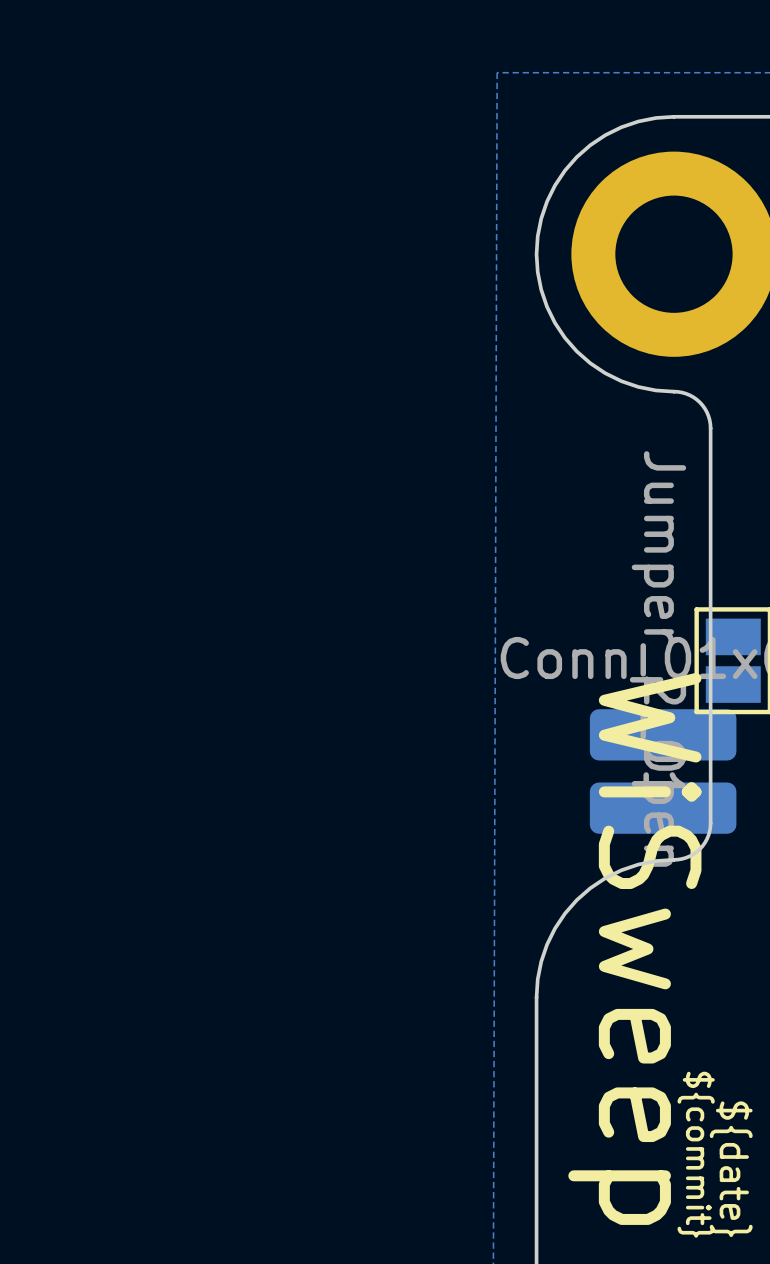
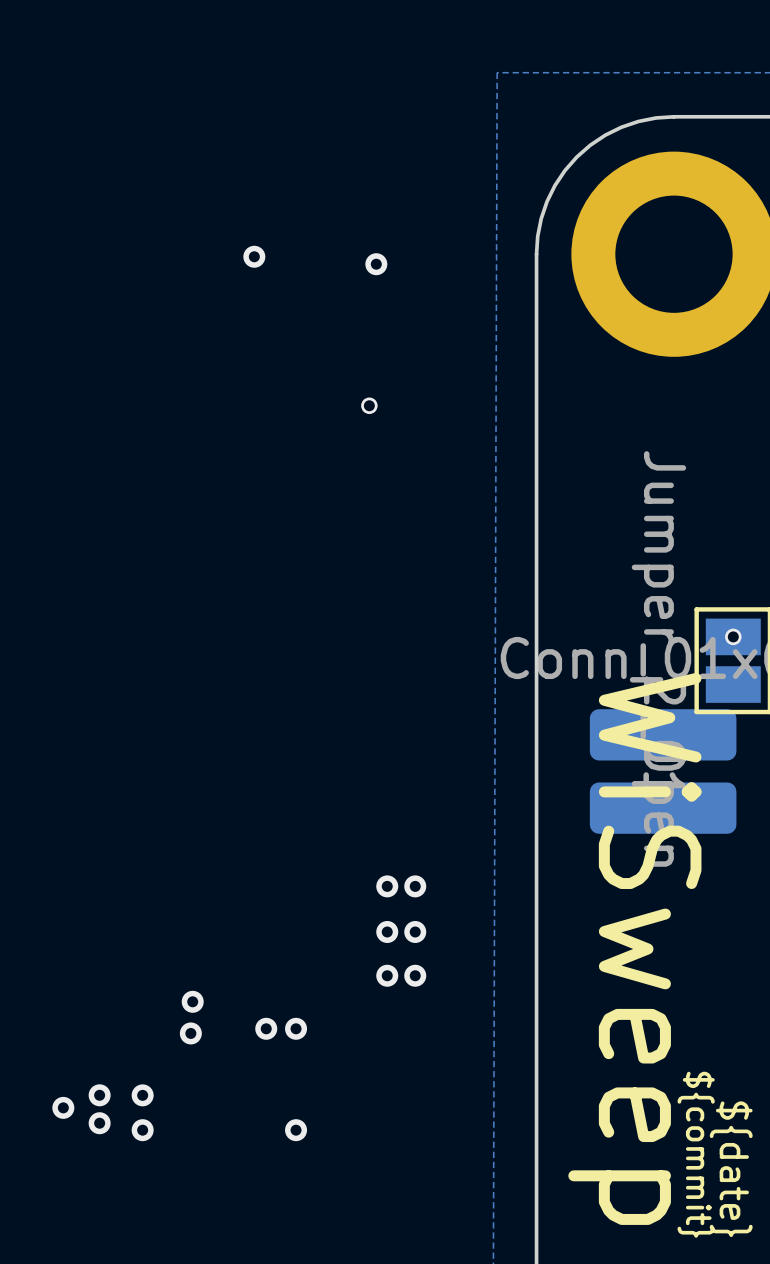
board edge: (673, 116) (638, 121) (621, 127) (605, 135) (576, 157) (564, 170) (547, 201) (537, 236) (536, 254) (537, 272) (547, 306) (564, 337) (576, 351) (605, 373) (621, 381) (638, 386) (689, 395) (699, 402) (708, 416) (710, 428) (710, 827) (702, 846) (689, 856) (638, 864) (621, 870) (590, 888) (576, 900) (554, 928) (547, 944) (541, 961) (536, 997) -> (673, 116) (638, 121) (621, 127) (590, 145) (576, 157) (554, 185) (547, 201) (537, 236) (536, 997)
via: none -> (254, 256)
via: none -> (376, 264)
via: none -> (369, 405)
via: none -> (733, 636)
via: none -> (387, 886)
via: none -> (415, 886)
via: none -> (387, 931)
via: none -> (415, 931)
via: none -> (387, 975)
via: none -> (415, 975)
via: none -> (192, 1001)
via: none -> (266, 1028)
via: none -> (296, 1028)
via: none -> (190, 1033)
via: none -> (99, 1095)
via: none -> (142, 1095)
via: none -> (63, 1107)
via: none -> (99, 1123)
via: none -> (142, 1130)
via: none -> (296, 1130)

